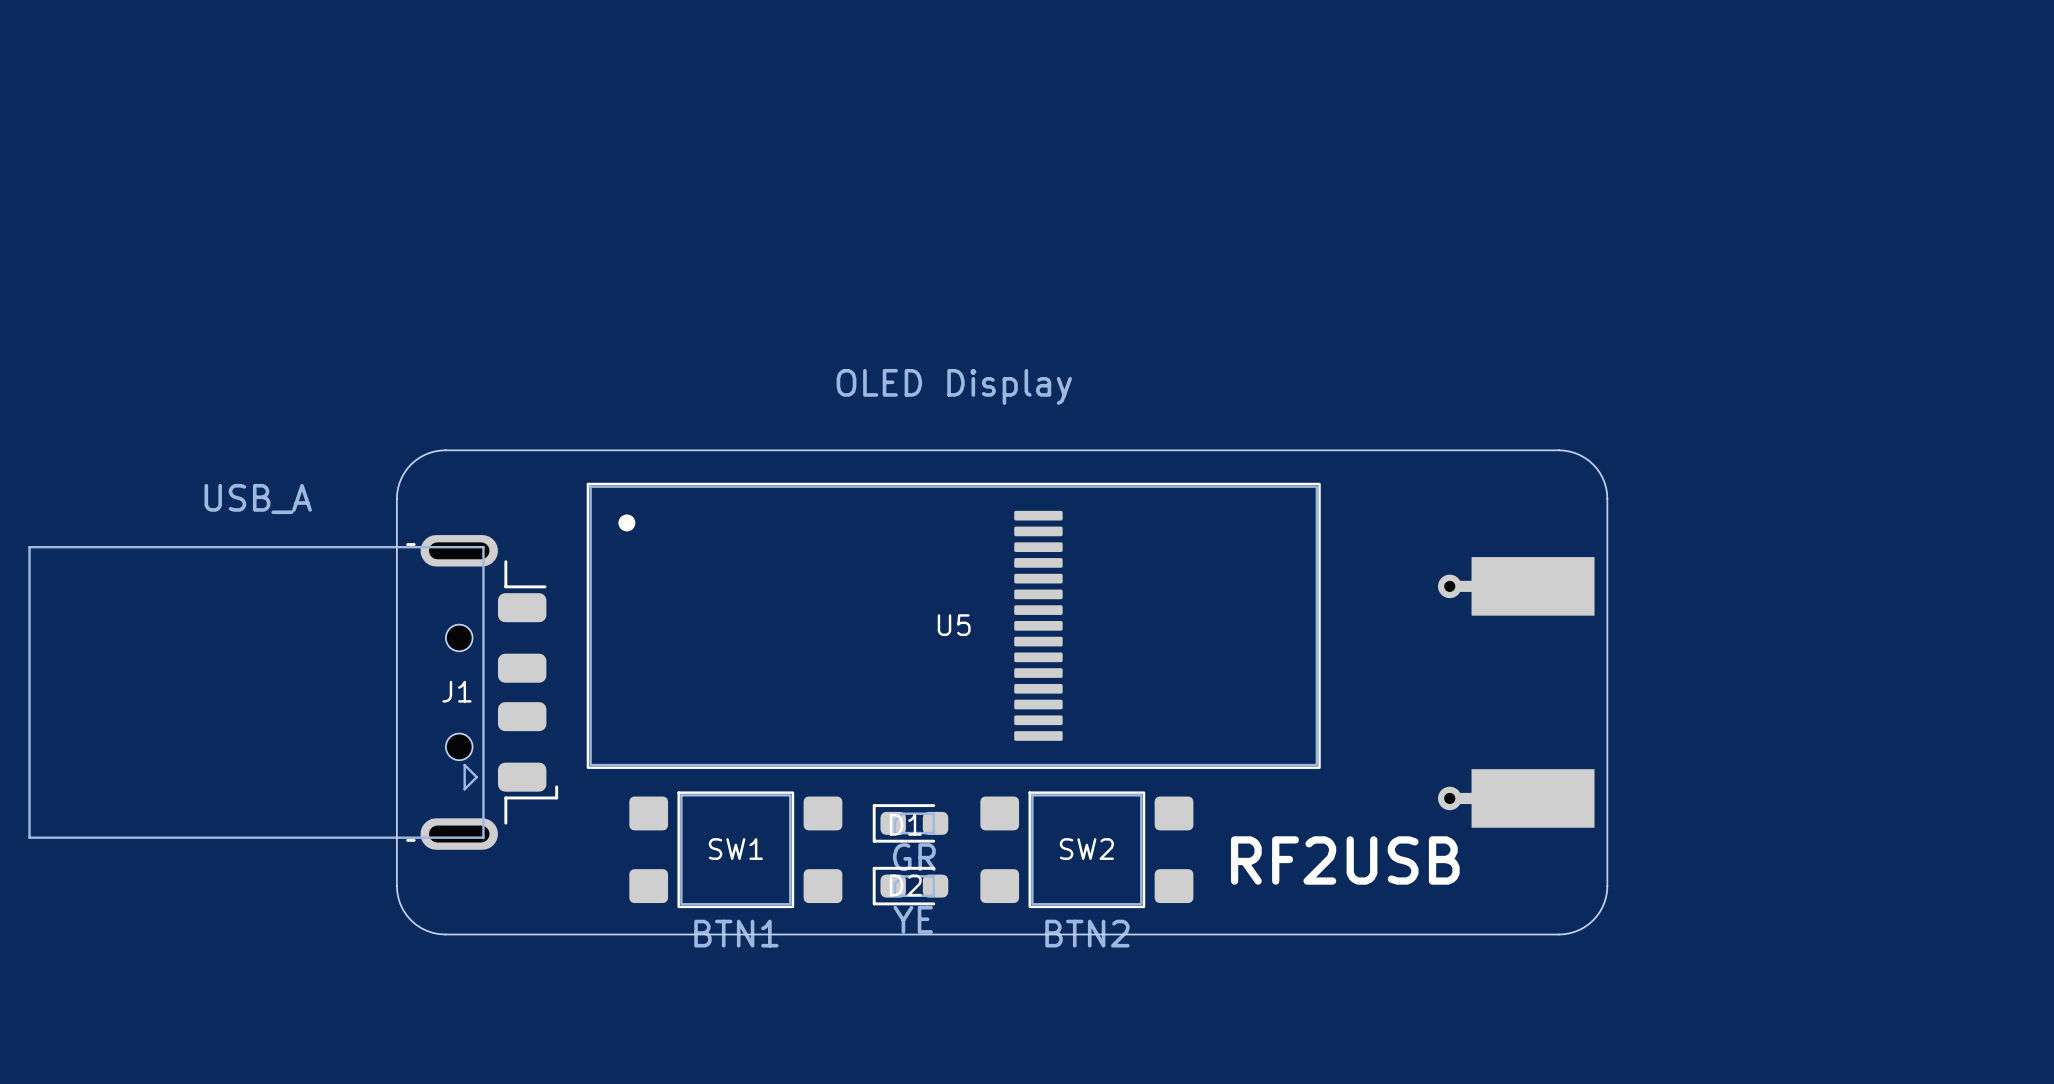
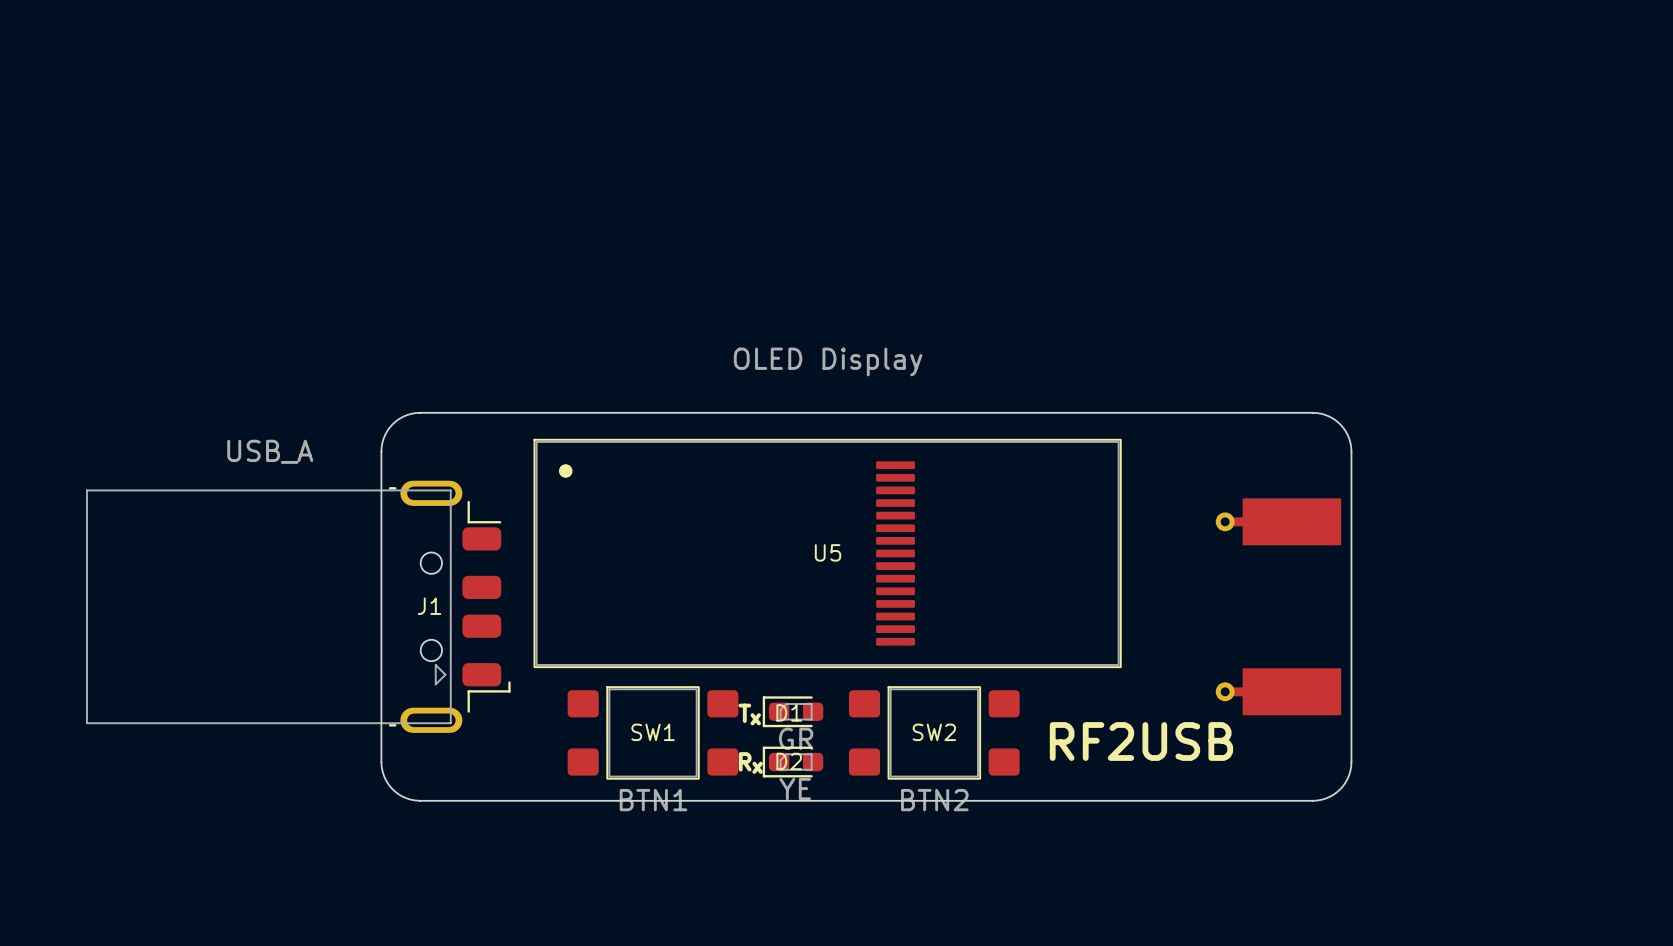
text: none -> Tx (749, 714)
text: none -> Rx (750, 762)

